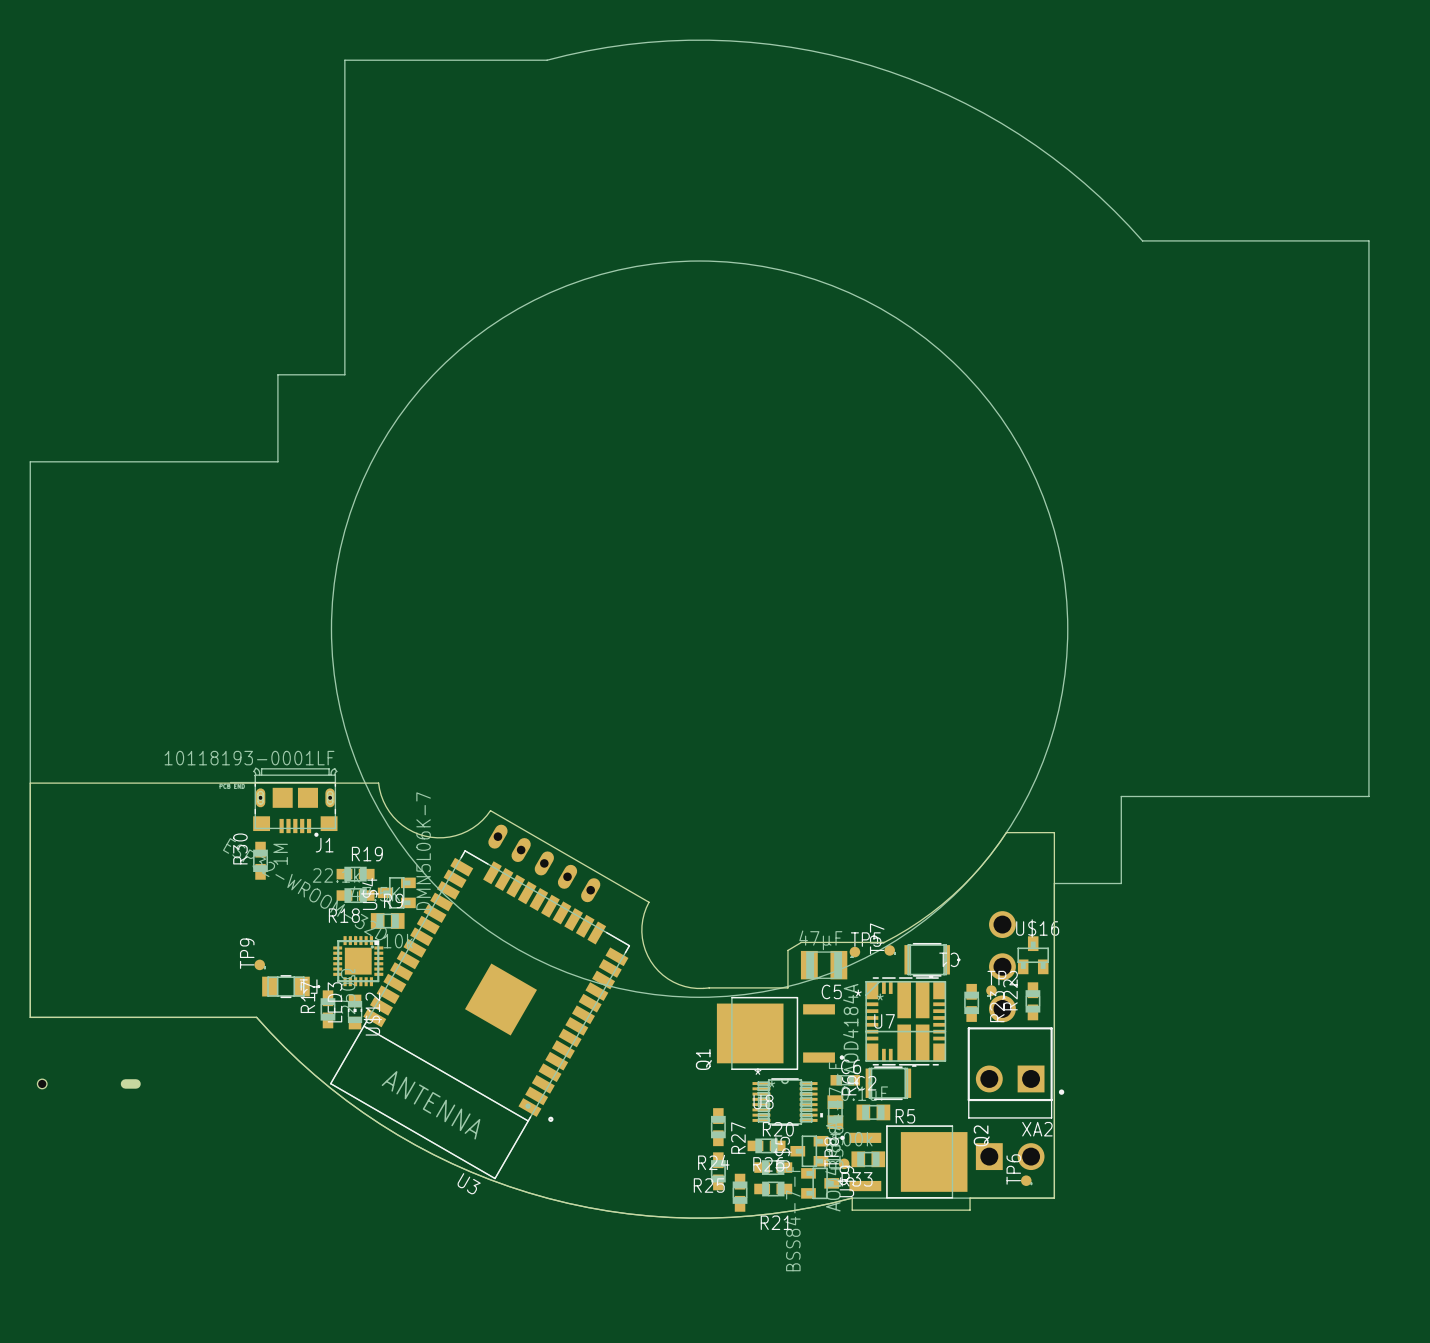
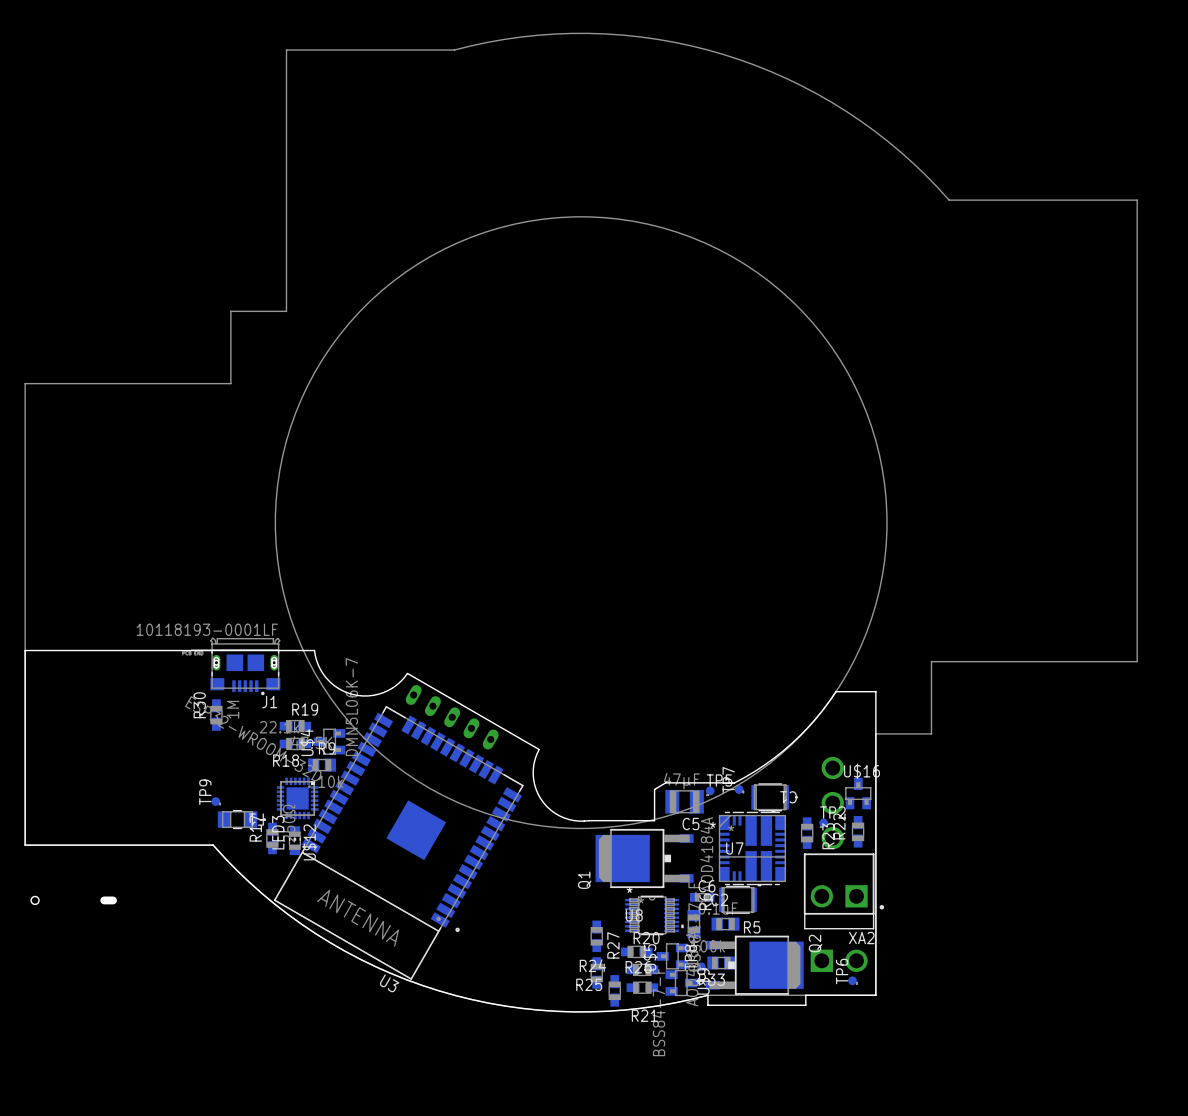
Q1 footprint: [716, 996, 845, 1070] -> [595, 828, 694, 889]
Q2 footprint: [840, 1125, 968, 1199] -> [705, 935, 804, 995]

